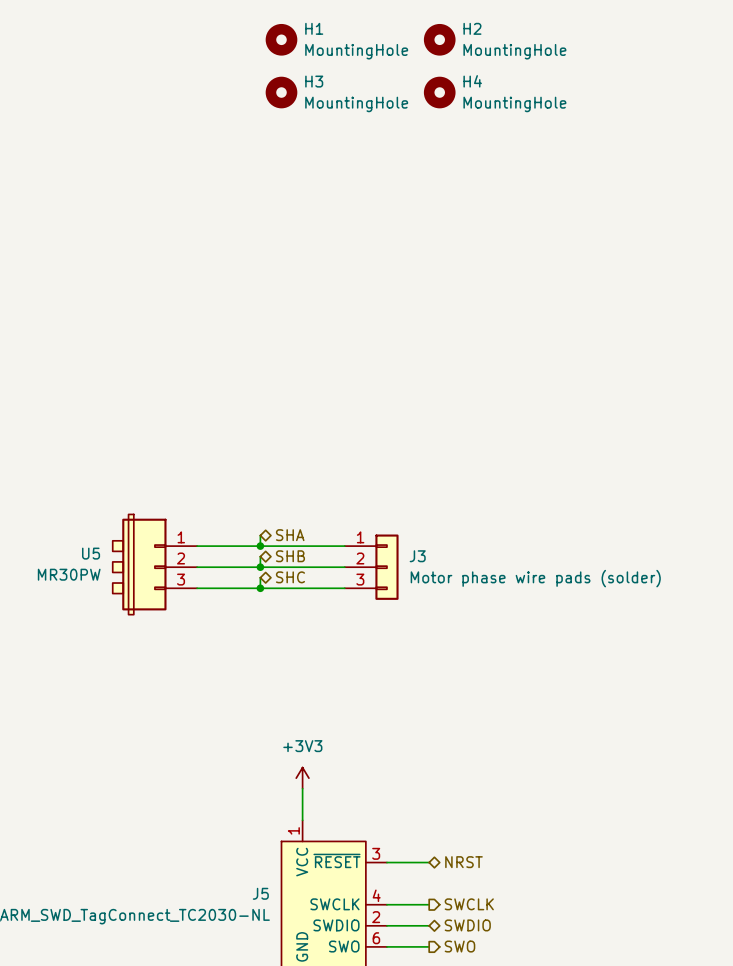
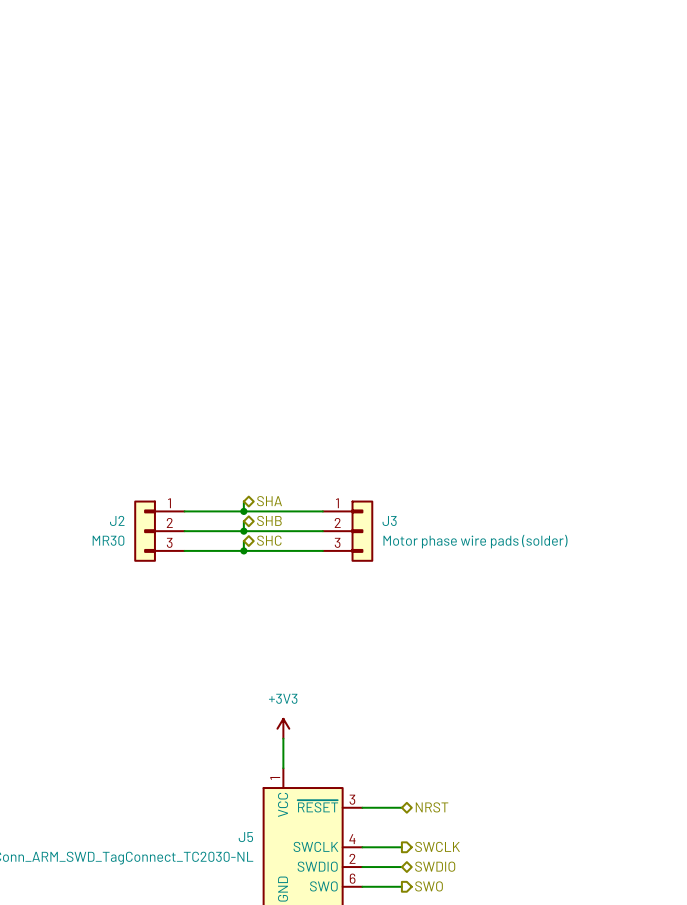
H1: MountingHole (281, 39) -> none
H2: MountingHole (439, 39) -> none
H3: MountingHole (281, 92) -> none
H4: MountingHole (439, 92) -> none
U5: MR30PW (154, 564) -> none
J2: none -> MR30 (159, 531)

